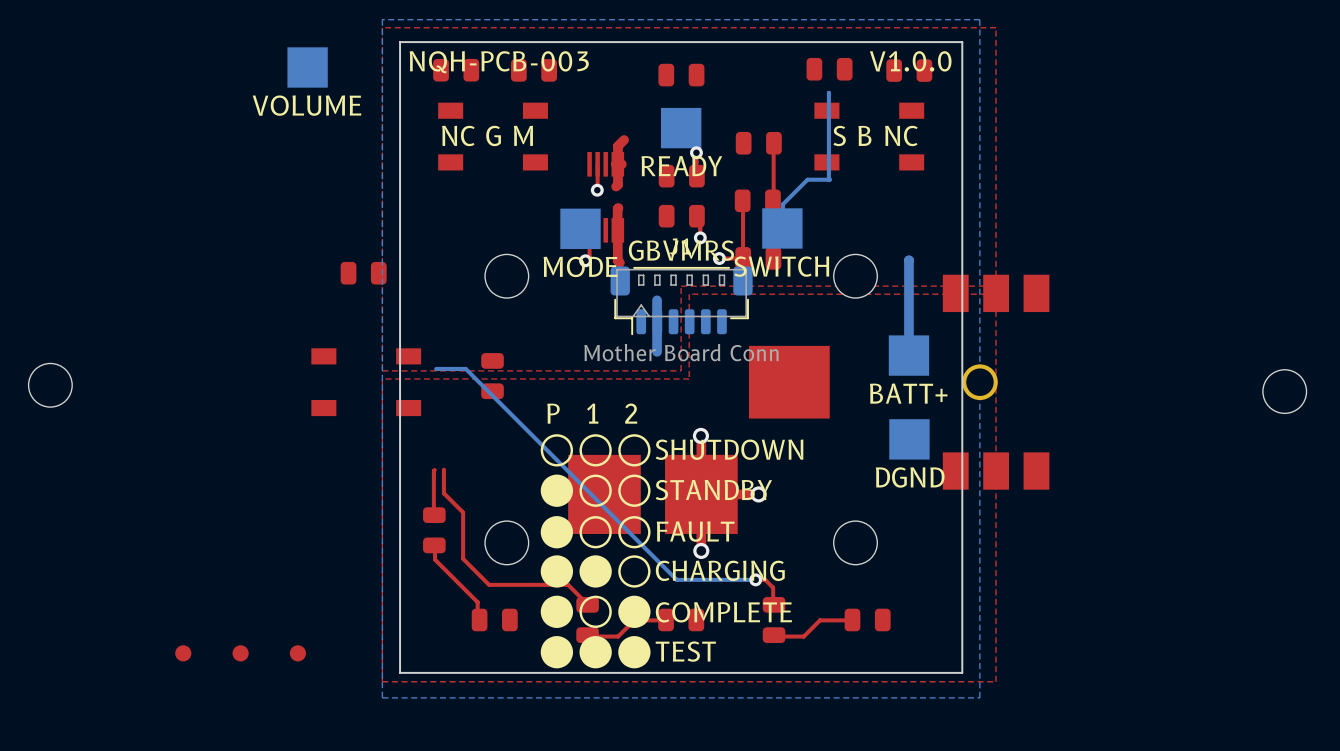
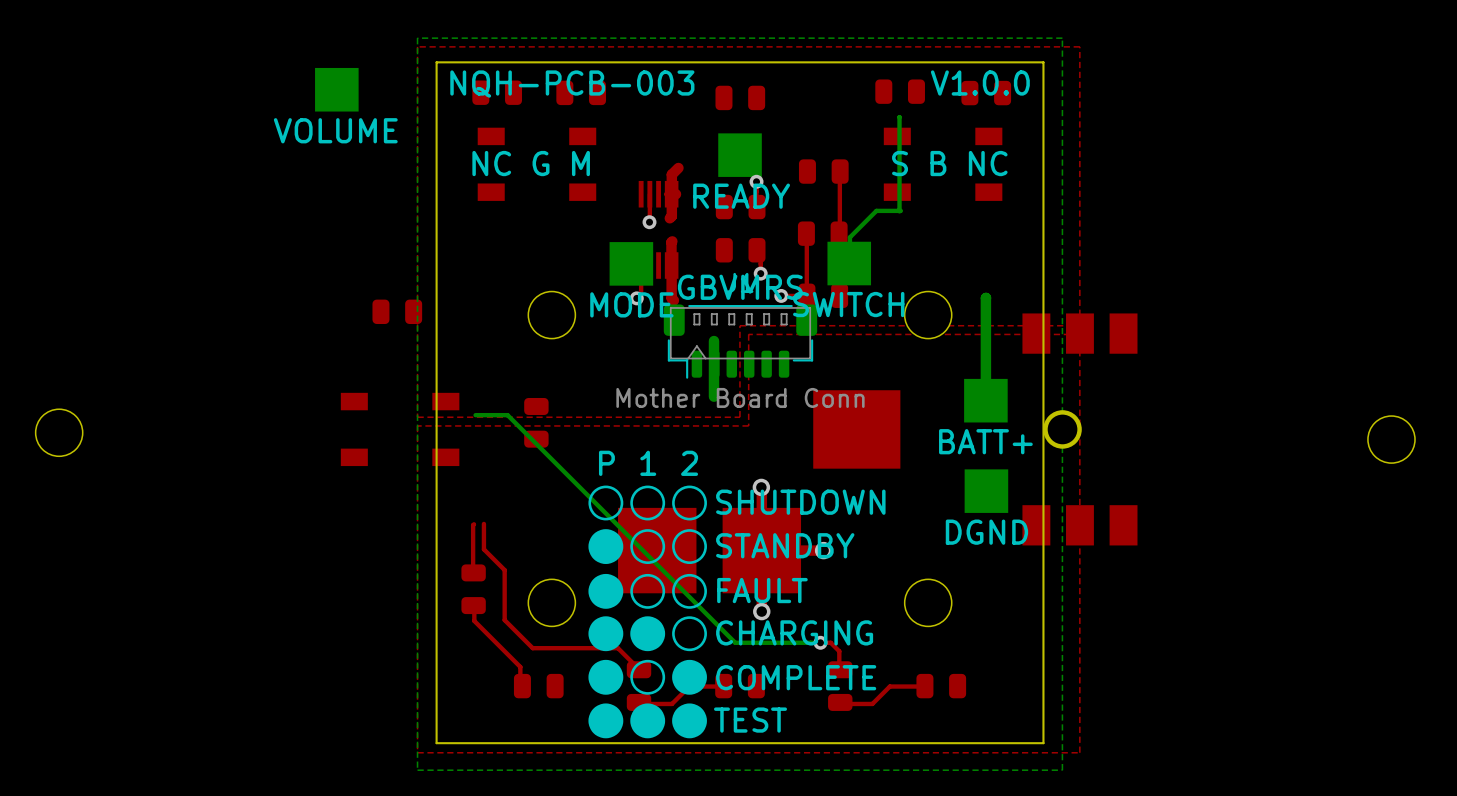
part: (183, 653) -> none
part: (240, 653) -> none
part: (297, 653) -> none

